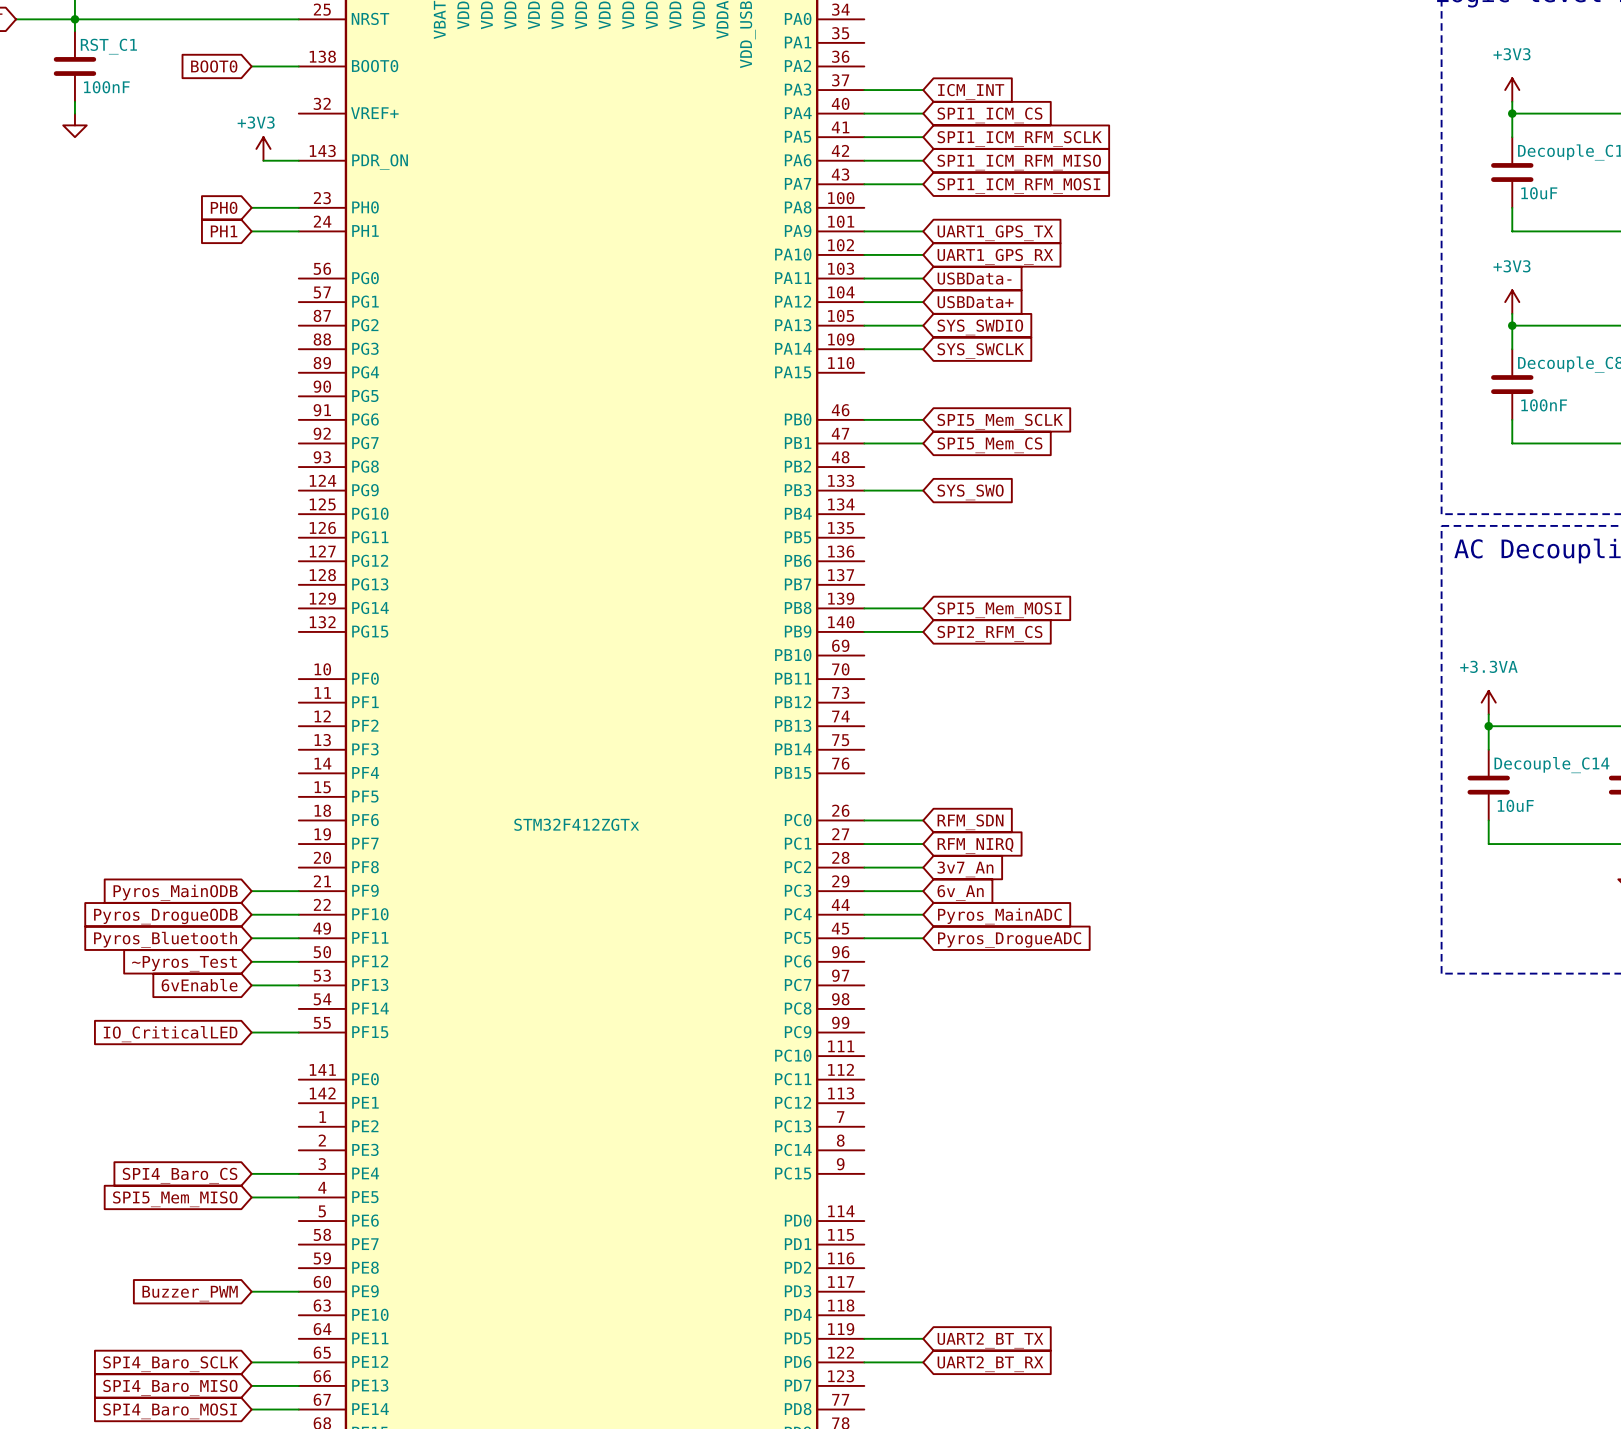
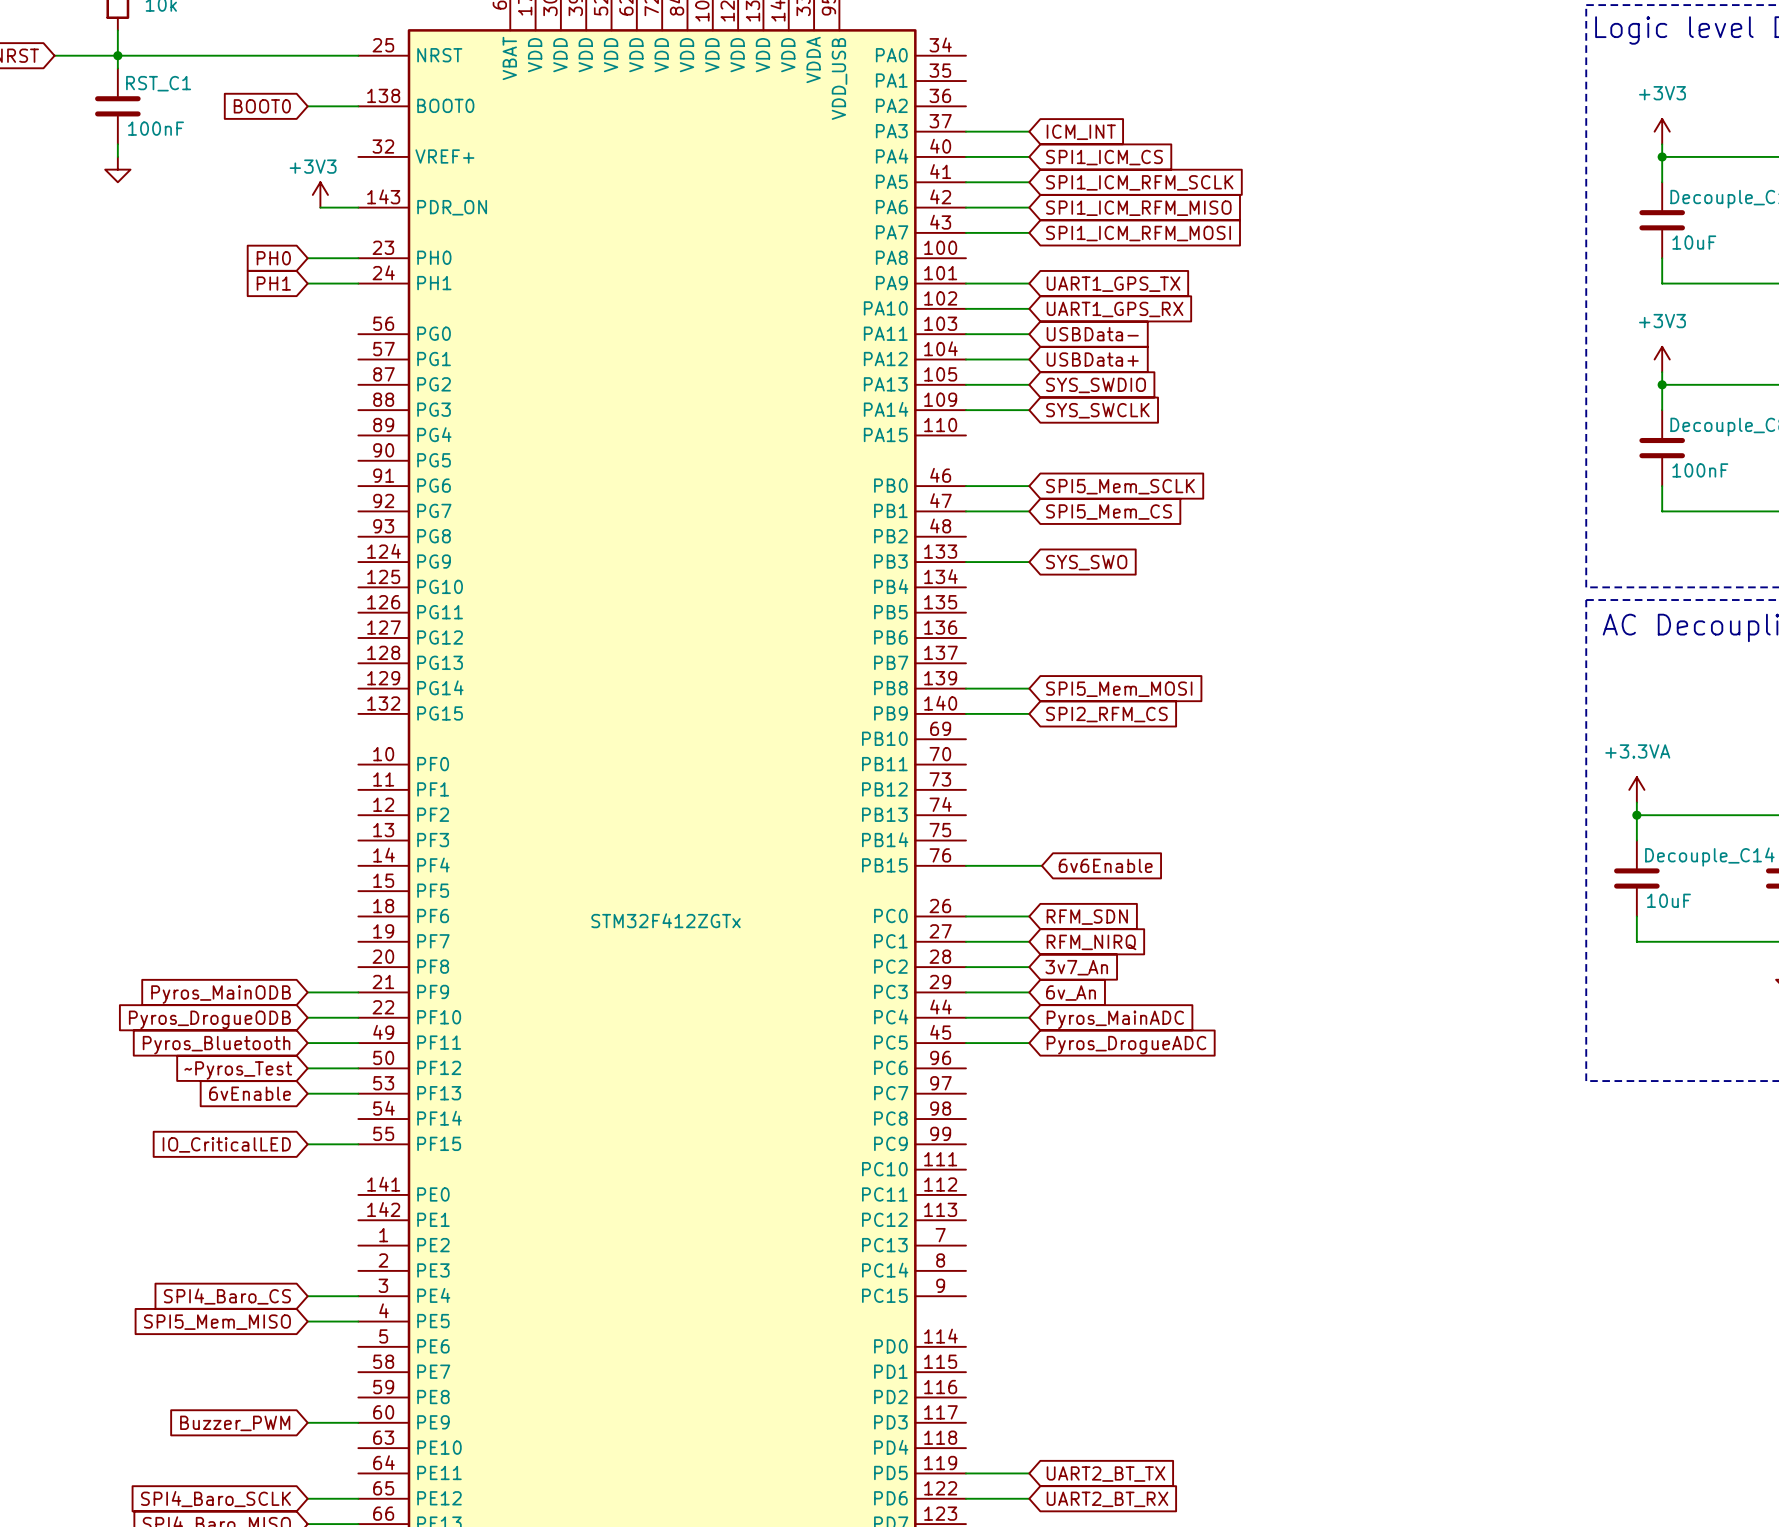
wire: none -> (965, 865) (1041, 865)
global label: none -> 6v6Enable (1105, 865)

